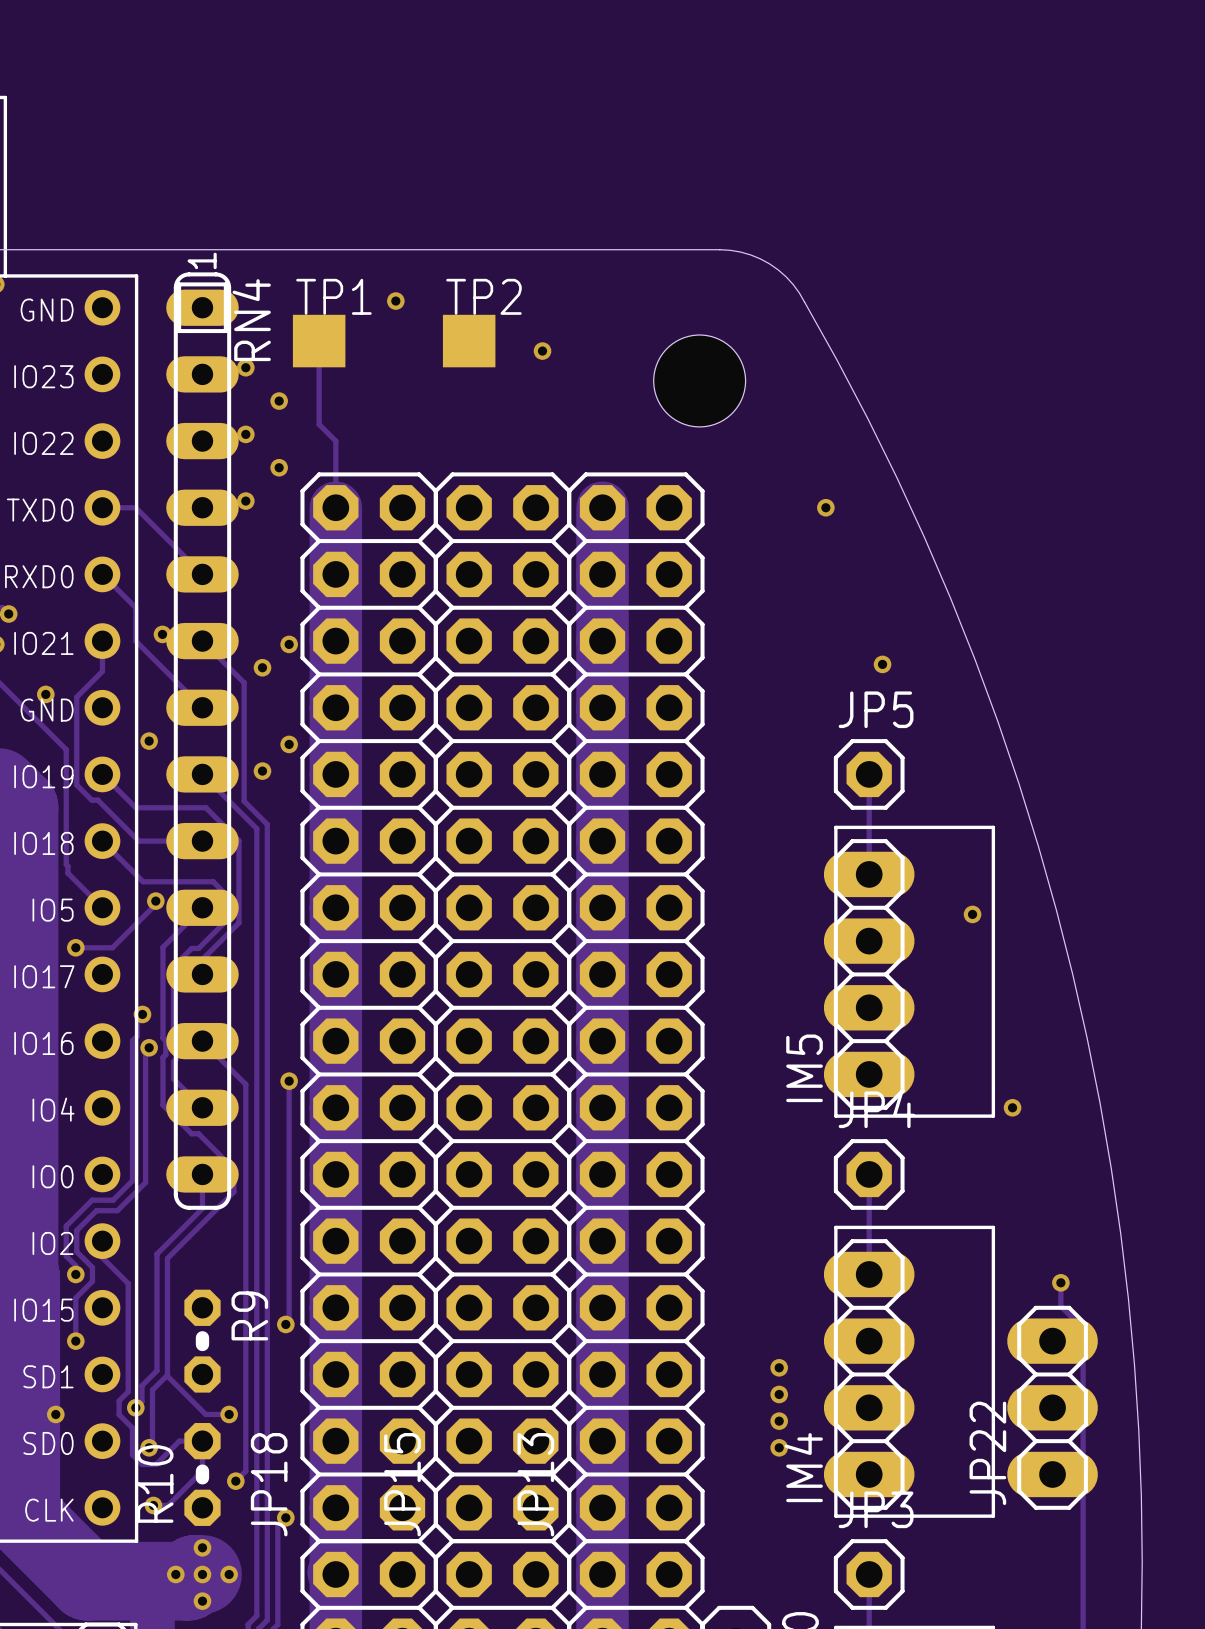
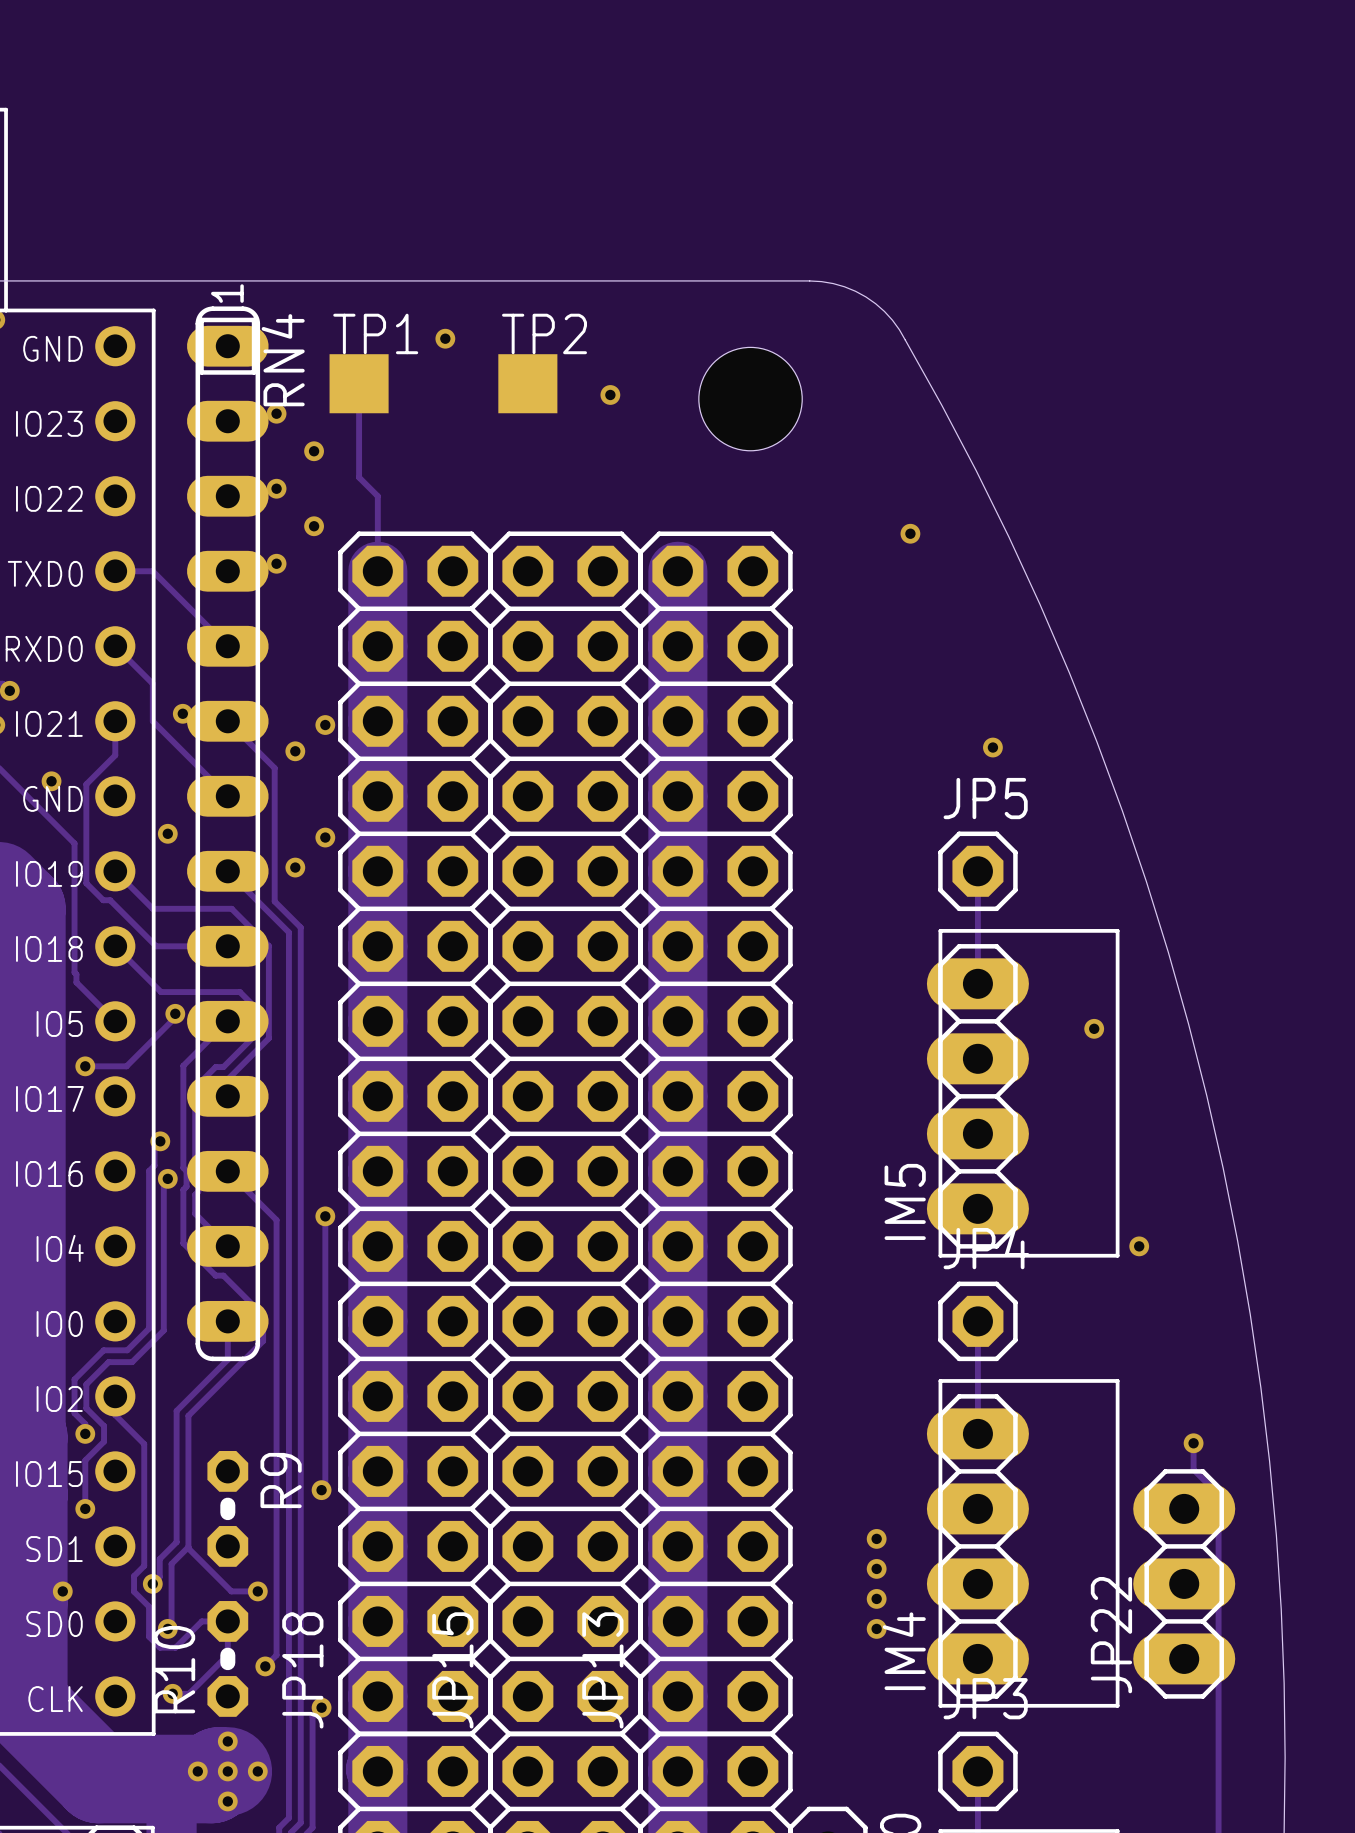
hole position: (699, 380) -> (750, 399)
via position: (825, 507) -> (910, 533)

